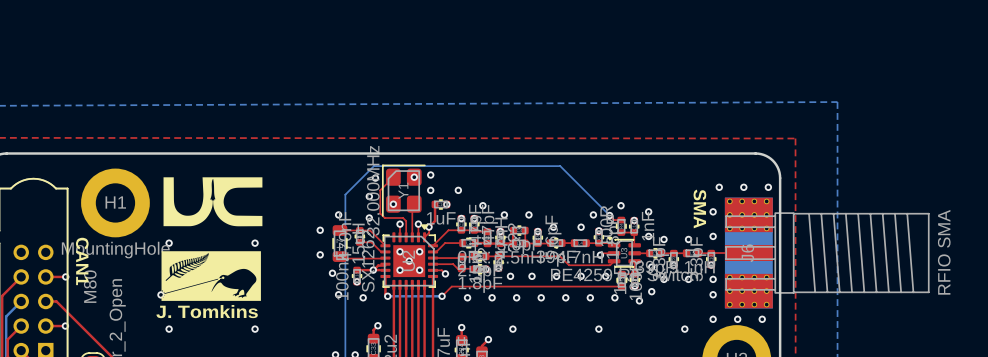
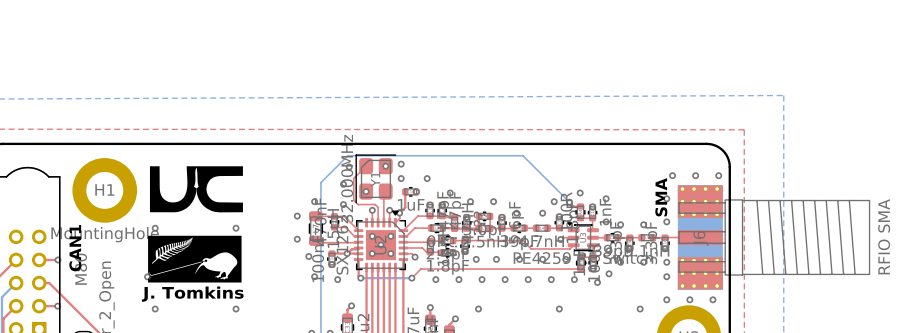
text rotation: 0° (699, 208) -> 180° (661, 197)
text rotation: 0° (82, 261) -> 180° (75, 248)

